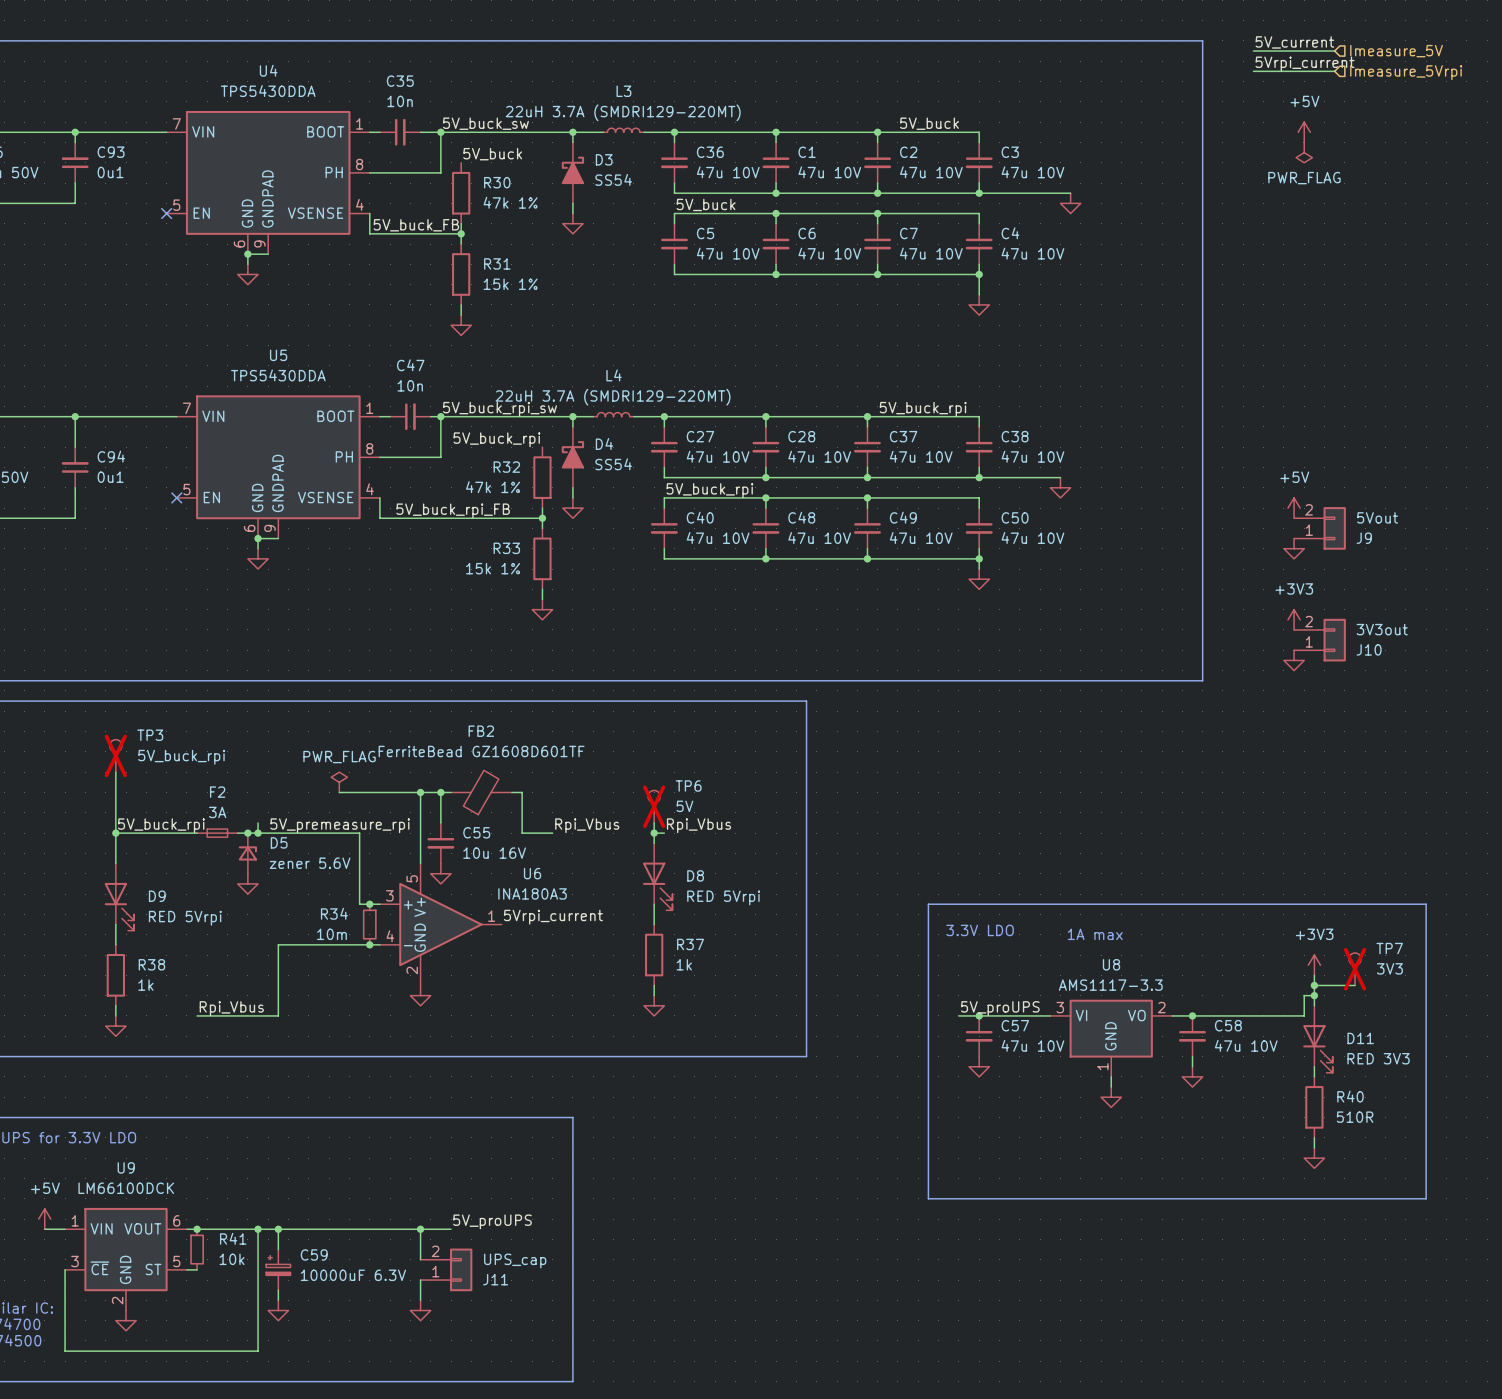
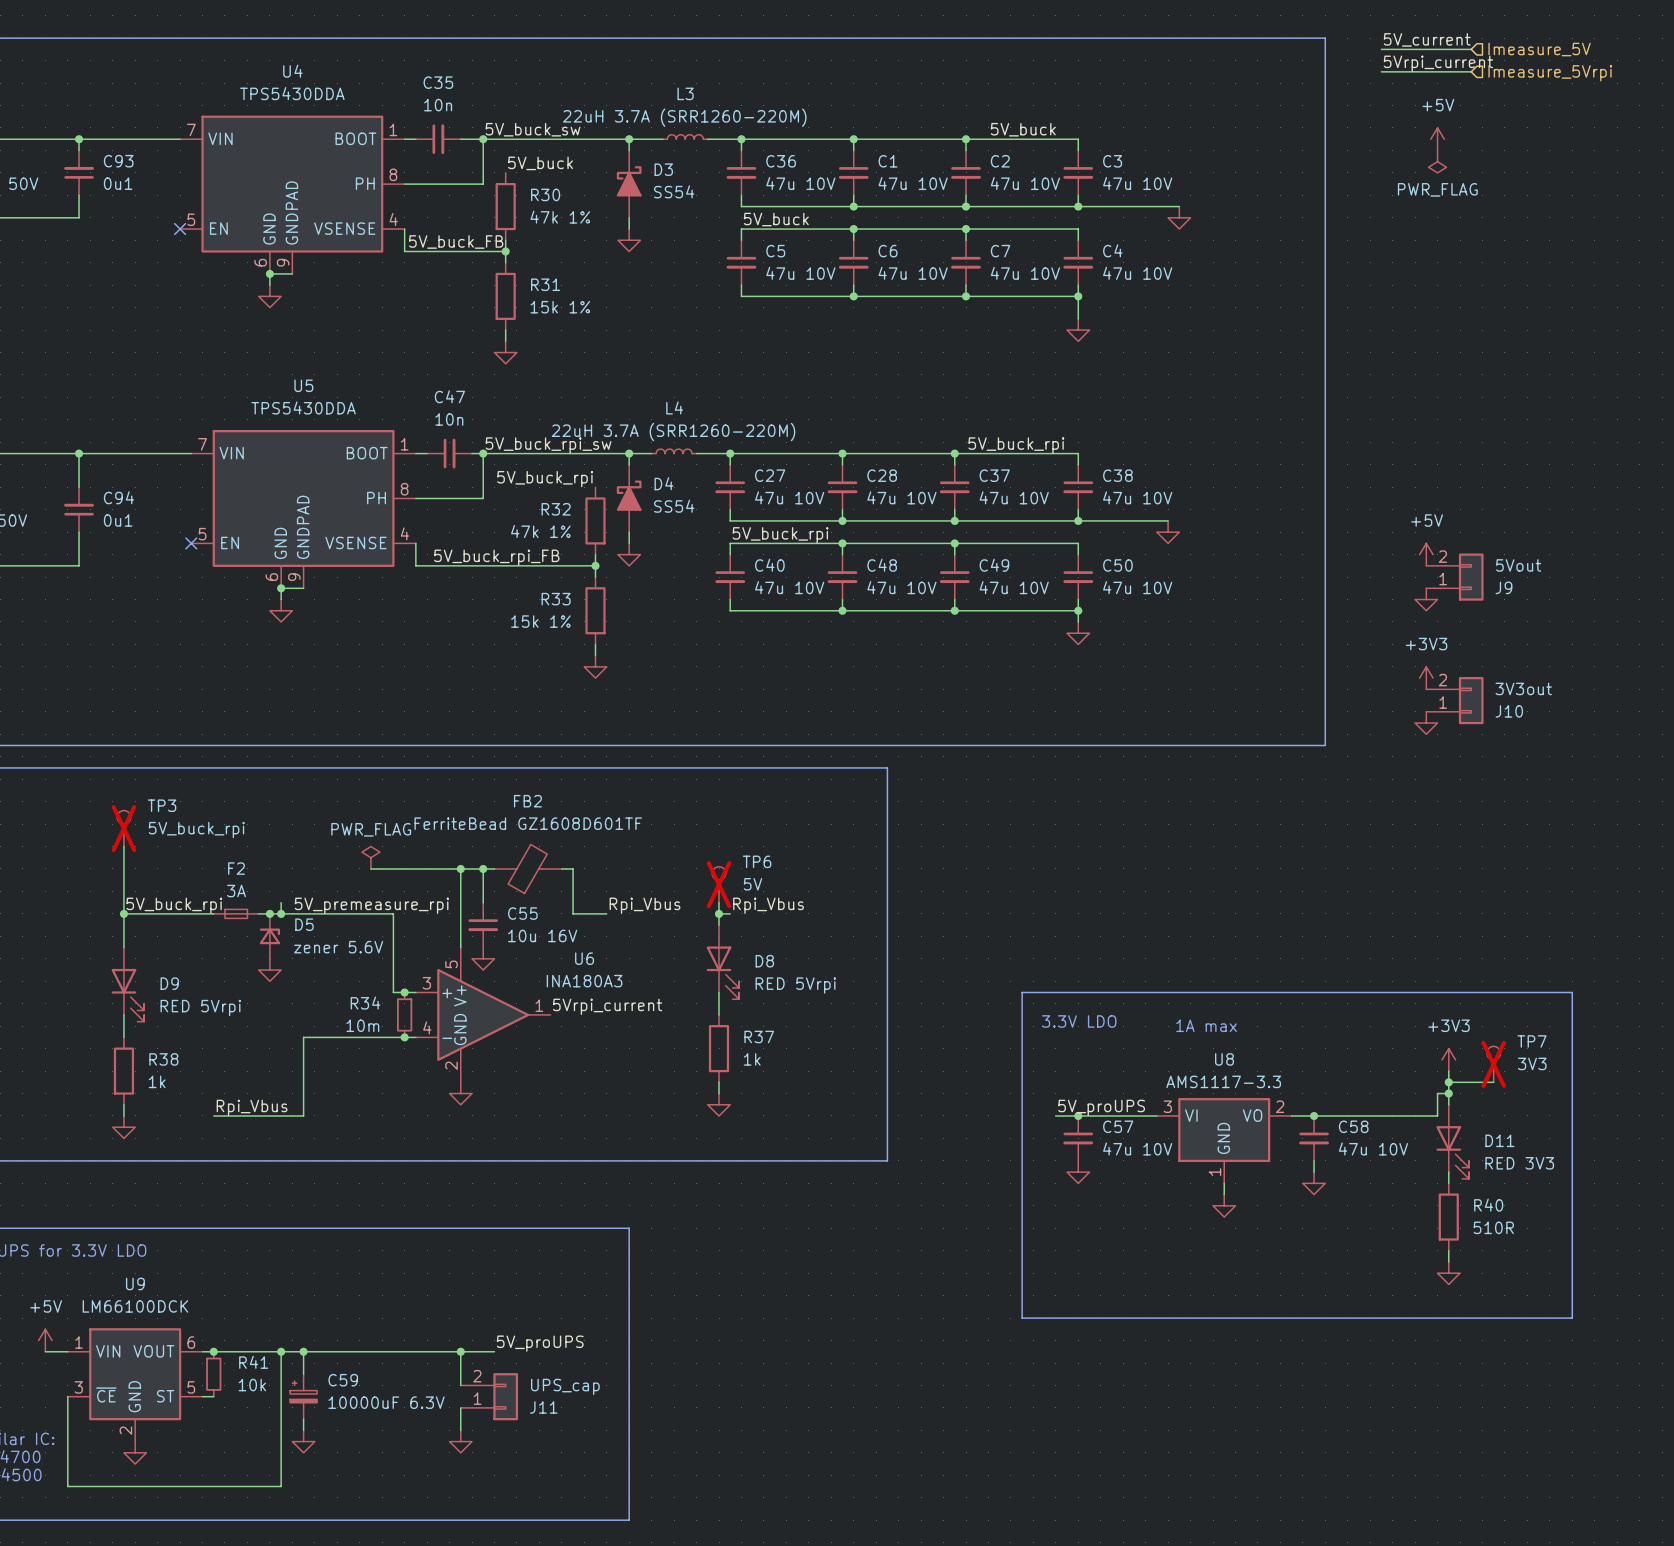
L3 value: 22uH 3.7A (SMDRI129-220MT) (623, 112) -> 22uH 3.7A (SRR1260-220M) (684, 117)
L4 value: 22uH 3.7A (SMDRI129-220MT) (613, 397) -> 22uH 3.7A (SRR1260-220M) (673, 432)

